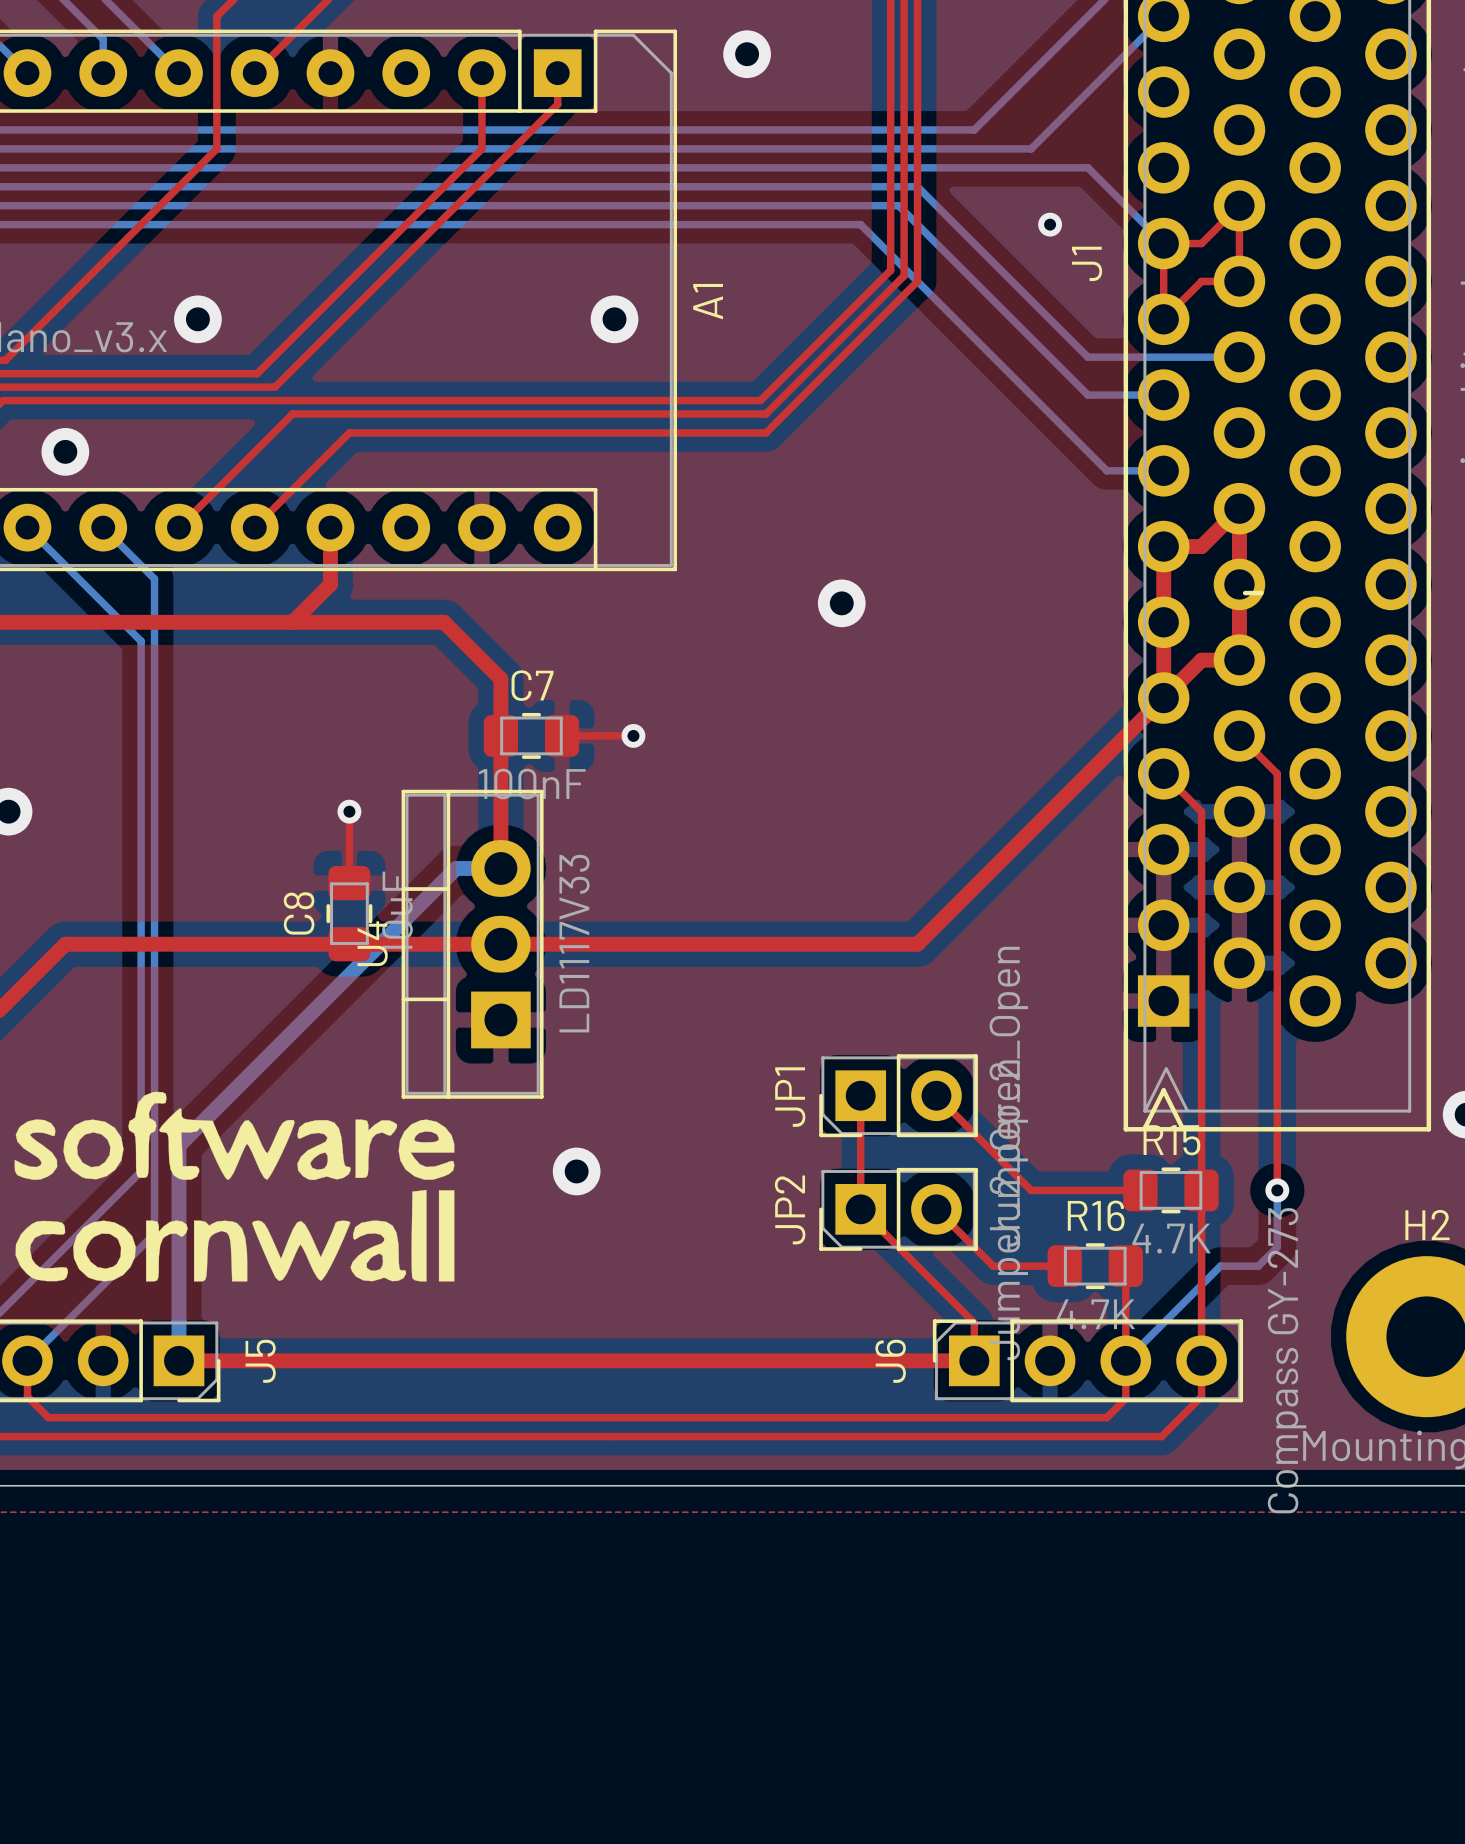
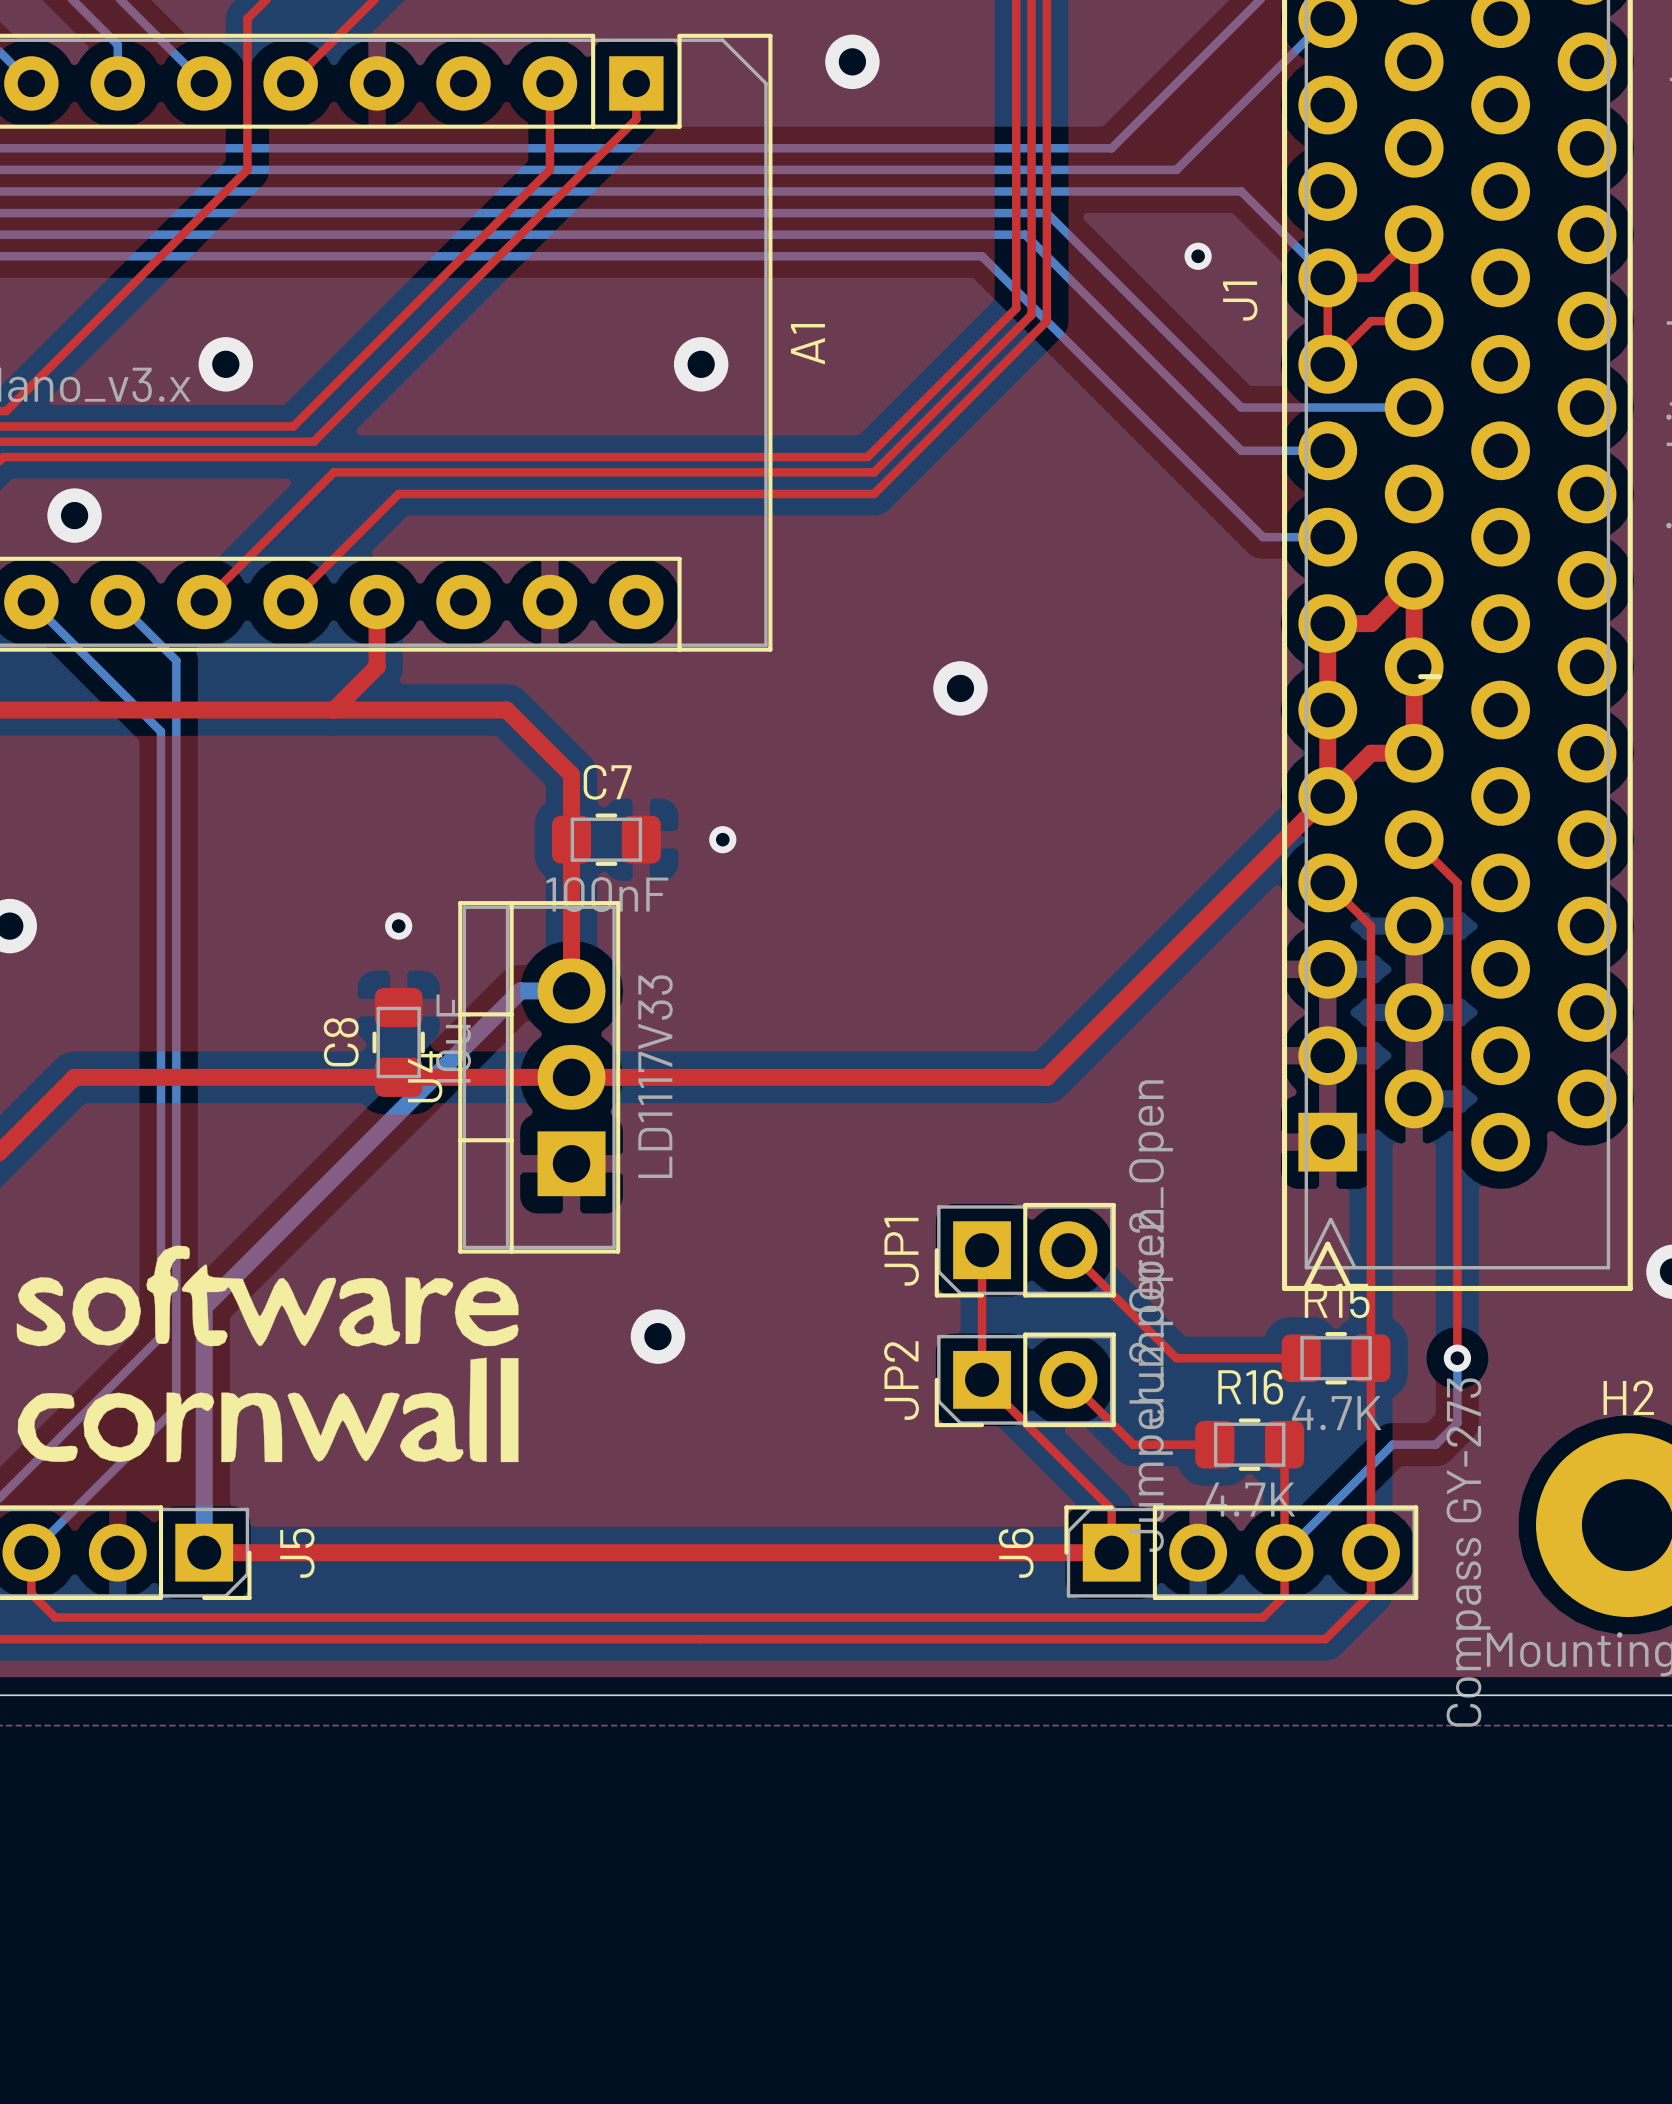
top track: (562, 735) (633, 735) -> none
top track: (349, 811) (349, 883) -> none

